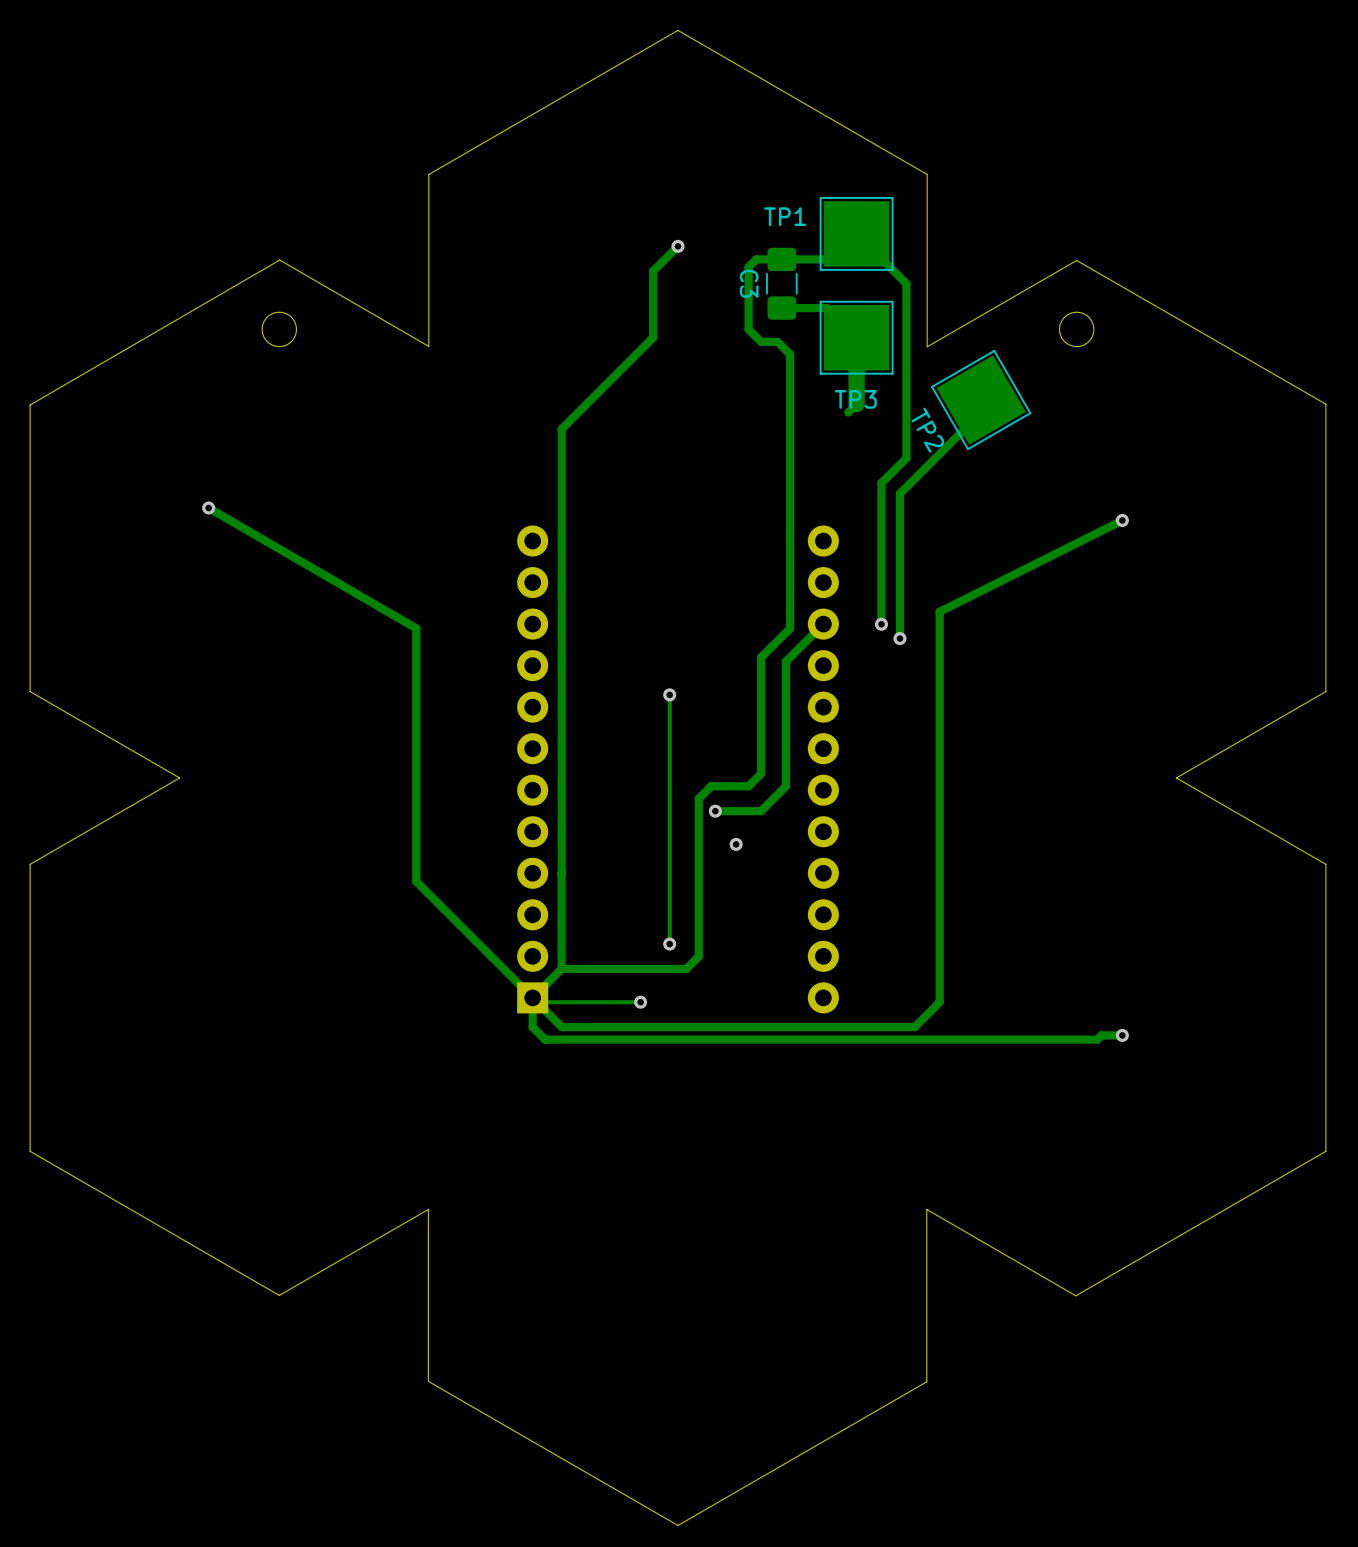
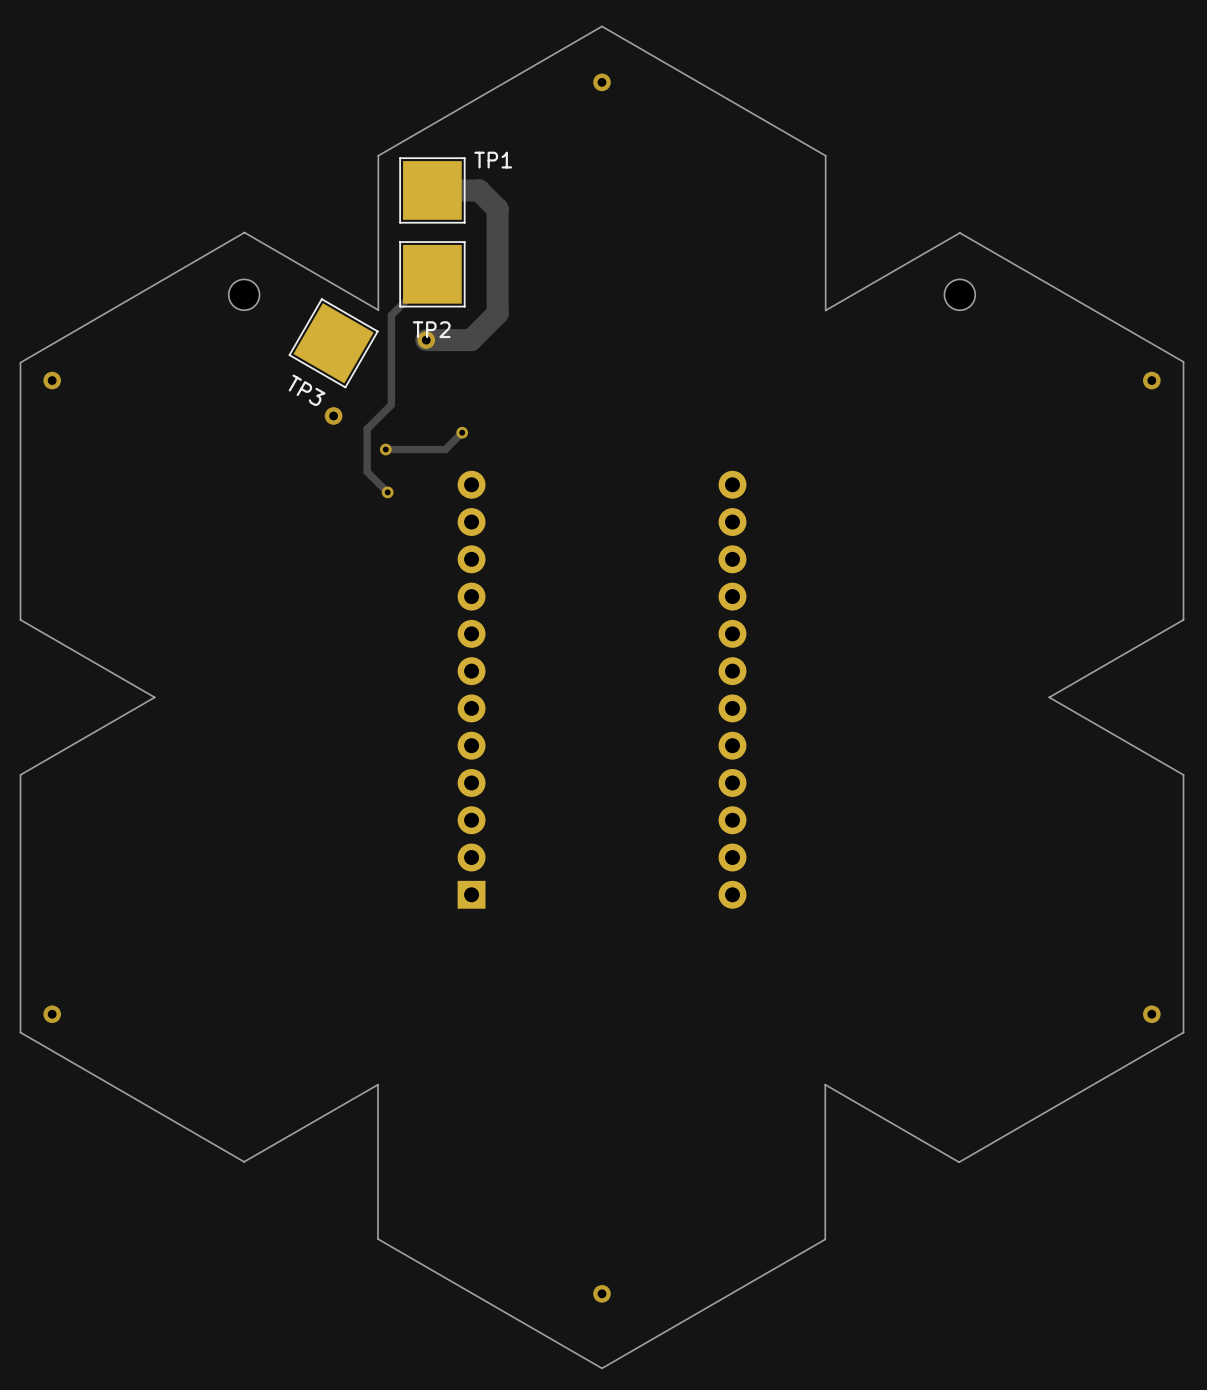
via: none -> (602, 82)
track: none -> (432, 190) (478, 190) (497, 209) (497, 313) (471, 340) (426, 340)
TP1 name position: TP1 (785, 216) -> TP1 (493, 160)
TP1 position: (856, 233) -> (432, 190)
track: (677, 246) (653, 271) (653, 337) (561, 429) (561, 873) -> none
via: (677, 246) -> none
C3: (781, 283) -> none
track: none -> (432, 274) (391, 315) (391, 404) (367, 429) (367, 471) (387, 492)
track: (781, 308) (826, 308) (856, 337) (856, 404) (848, 412) -> none
TP3 rotation: 0° (856, 337) -> 30° clockwise (333, 343)
TP3 position: (856, 337) -> (333, 343)
via: none -> (426, 340)
TP2 rotation: 0° (981, 400) -> 30° clockwise (432, 274)
TP2 position: (981, 400) -> (432, 274)
track: (977, 416) (899, 493) (899, 638) -> none
via: none -> (52, 380)
via: none -> (1151, 380)
TP2 name position: TP2 (927, 430) -> TP2 (431, 329)
via: none -> (333, 415)
track: none -> (462, 432) (445, 449) (385, 449)
via: none -> (462, 432)
via: none -> (385, 449)
track: (208, 508) (416, 628) (416, 881) (561, 1027) (914, 1027) (939, 1002) (939, 611) (1122, 520) -> none
via: (208, 508) -> none
via: (1122, 520) -> none
via: none -> (387, 492)
track: (823, 624) (785, 661) (785, 786) (761, 811) (715, 811) -> none
track: (881, 624) (881, 483) (906, 458) (906, 283) (856, 233) (831, 259) (756, 259) (748, 267) (748, 329) (761, 341) (777, 341) (790, 354) (790, 628) (761, 657) (761, 773) (748, 786) (711, 786) (698, 798) (698, 956) (686, 968) (561, 968) -> none
via: (881, 624) -> none
via: (899, 638) -> none
track: (669, 694) (669, 944) -> none
via: (669, 694) -> none
via: (715, 811) -> none
via: (736, 844) -> none
track: (561, 873) (561, 968) -> none
via: (669, 944) -> none
track: (561, 968) (532, 997) (532, 1027) (545, 1039) (1097, 1039) (1101, 1035) (1122, 1035) -> none
track: (640, 1002) (537, 1002) -> none
via: (640, 1002) -> none
via: (1122, 1035) -> none
via: none -> (52, 1014)
via: none -> (1151, 1014)
via: none -> (602, 1293)

